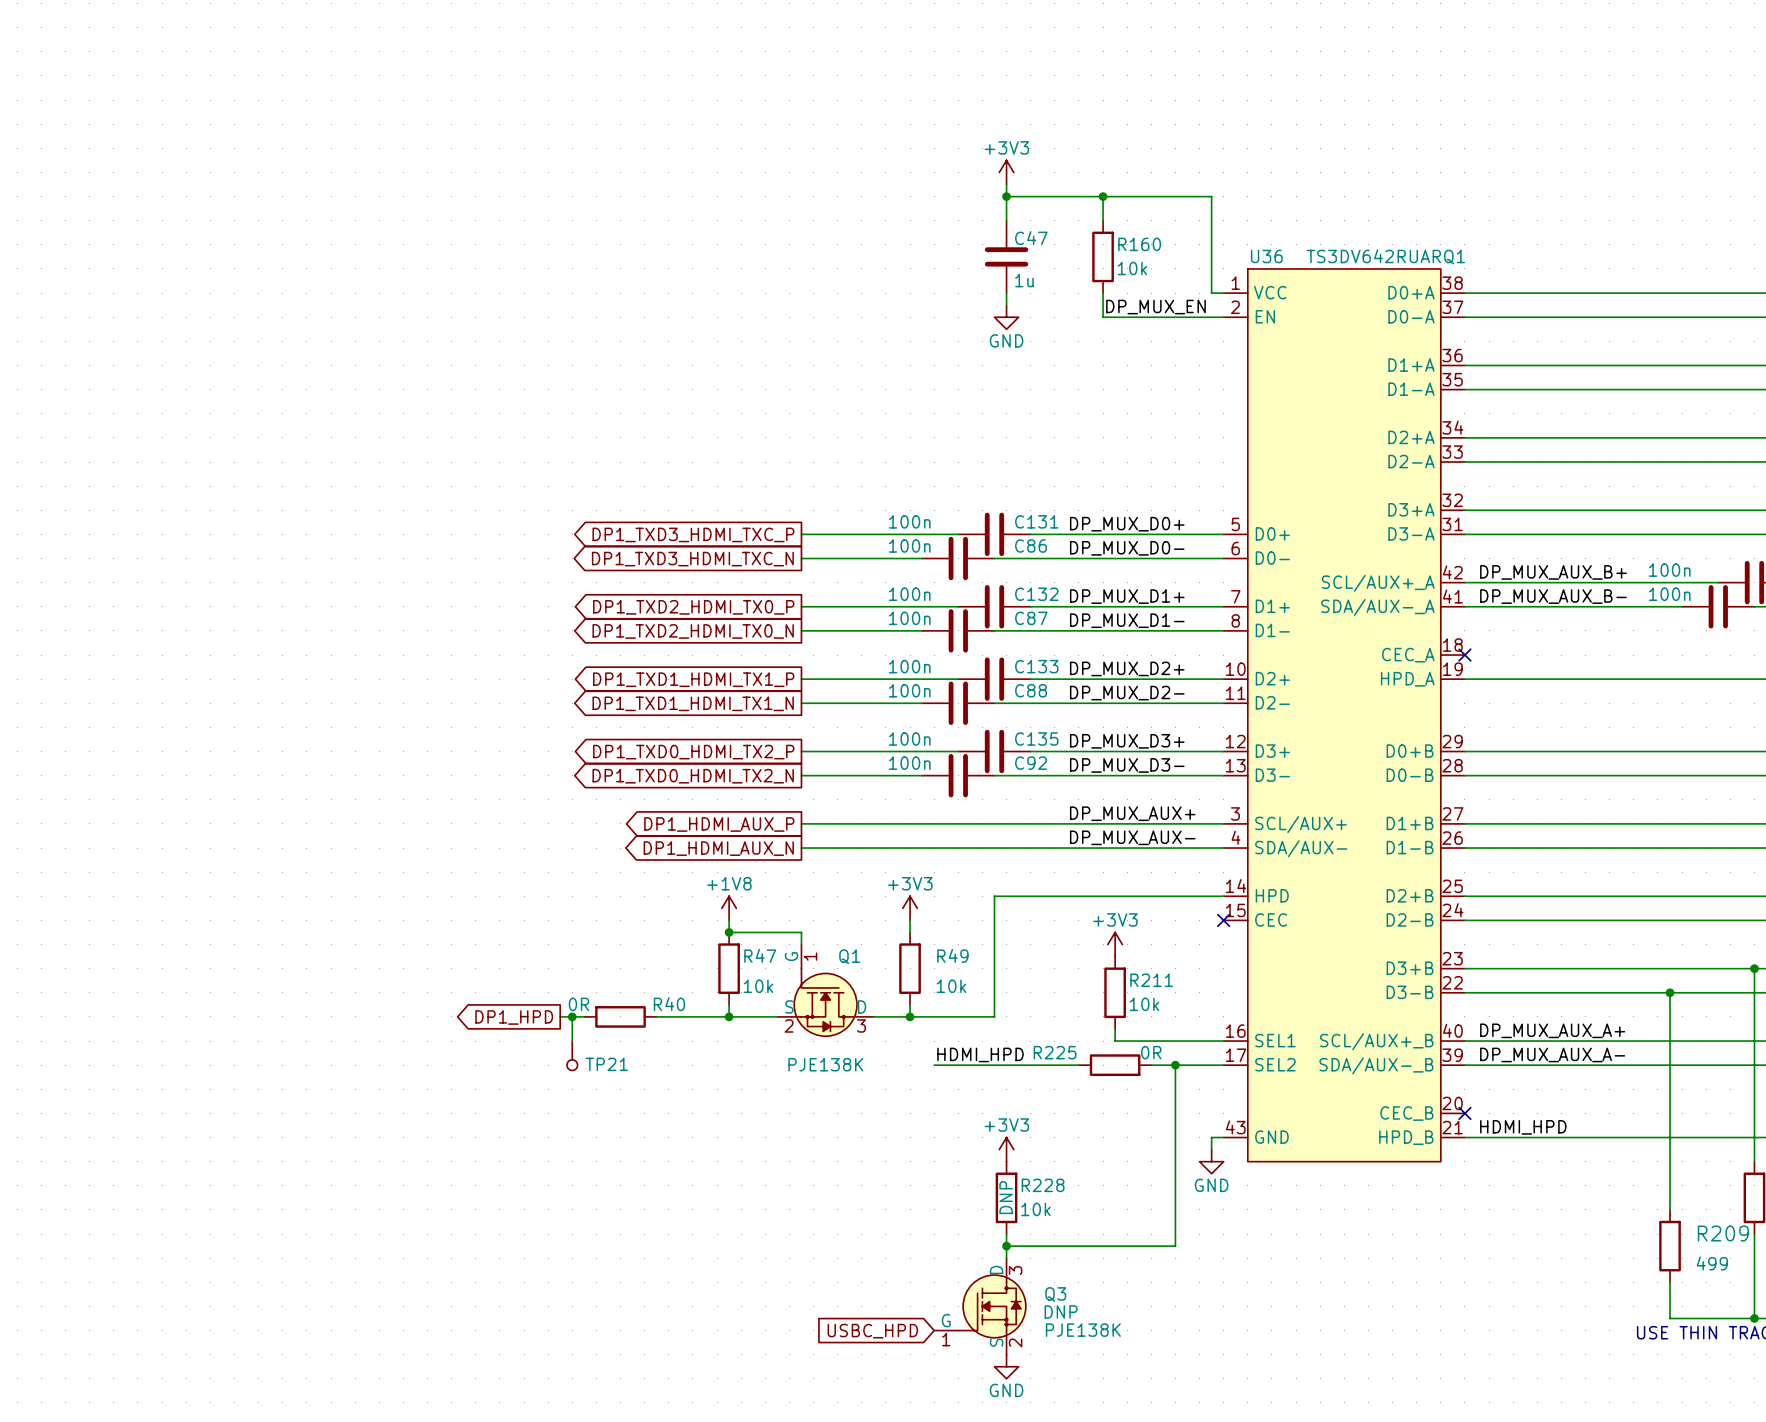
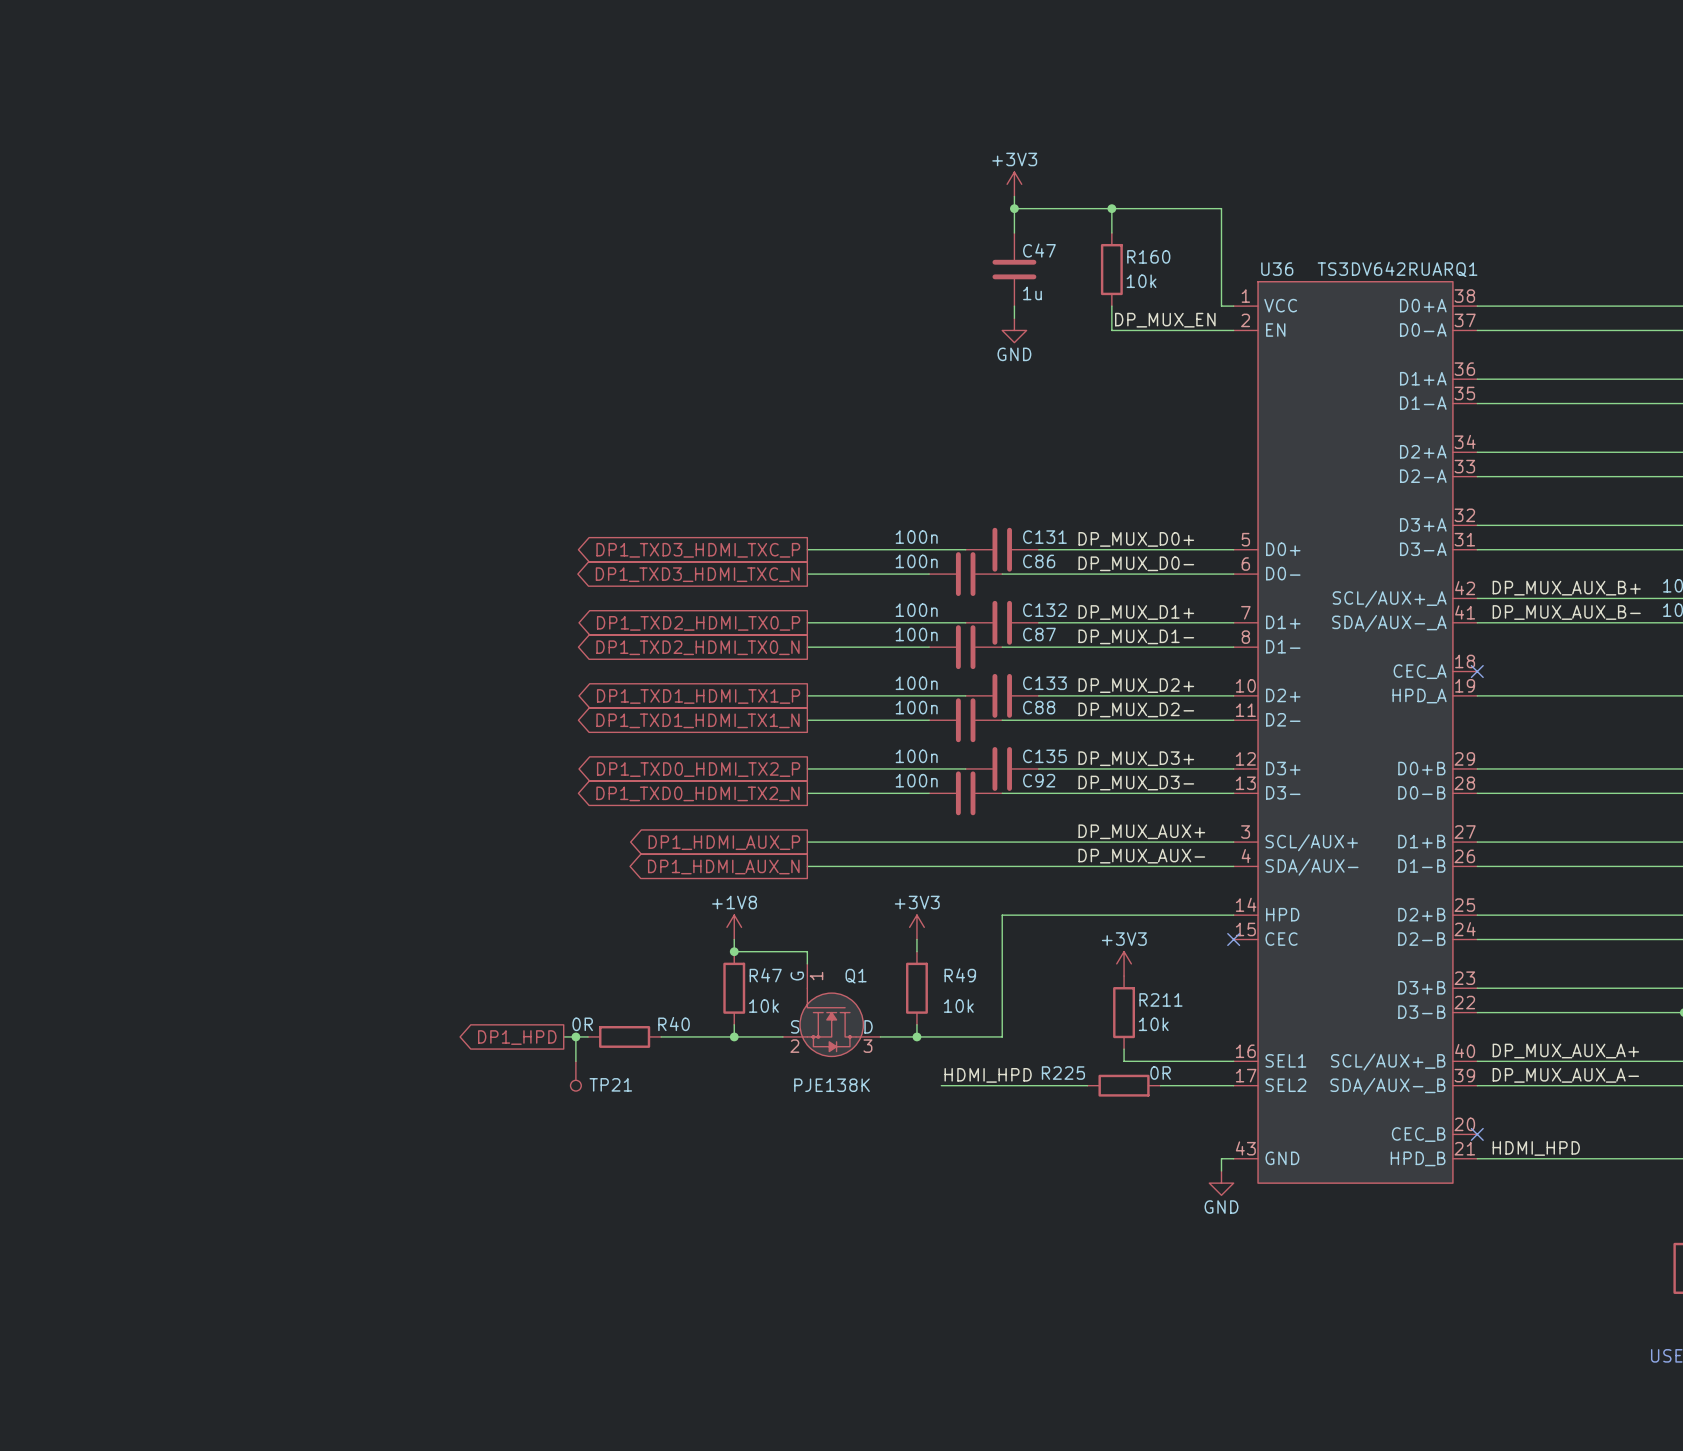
wire: (1175, 1065) (1175, 1246) (1006, 1246) -> none
junction: (1175, 1065) -> none
power symbol: +3V3 (1006, 1149) -> none
R228: (1006, 1197) -> none
wire: (1006, 1234) (1006, 1258) -> none
junction: (1006, 1246) -> none
Q3: PJE138K (980, 1306) -> none
global label: USBC_HPD (872, 1331) -> none
power symbol: GND (1006, 1366) -> none

